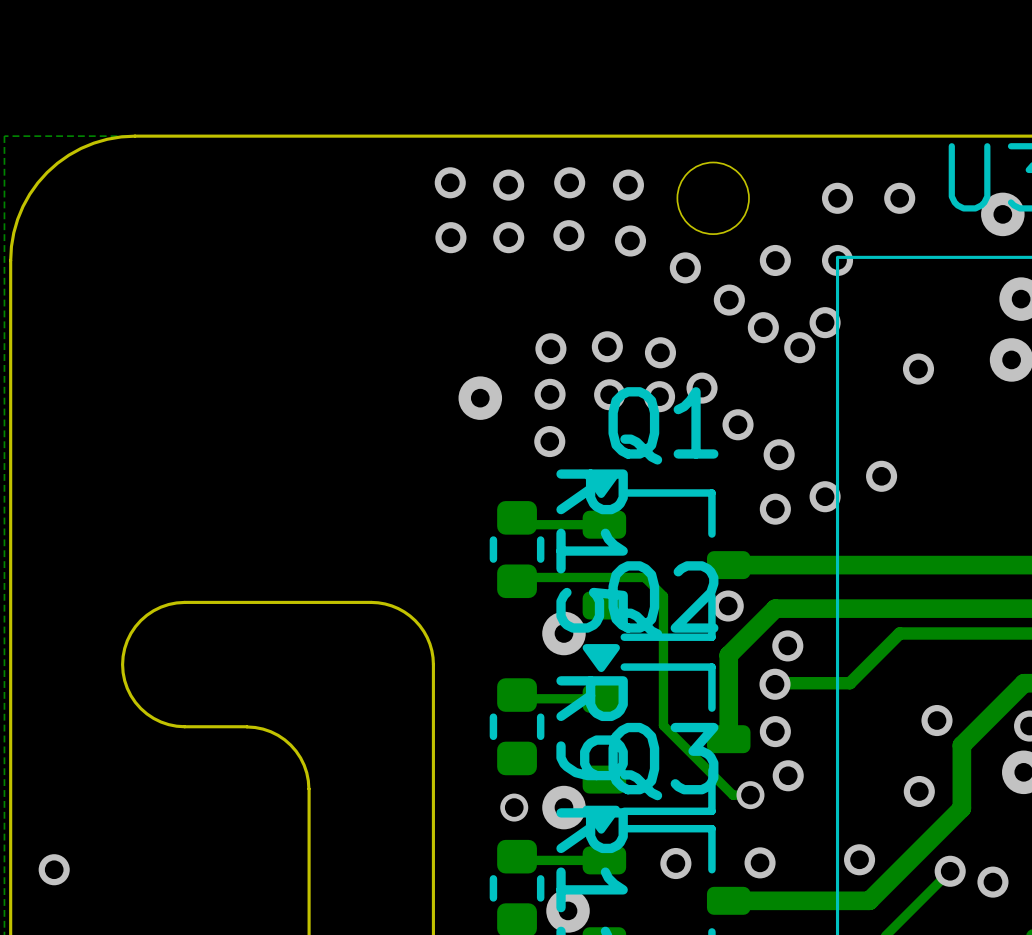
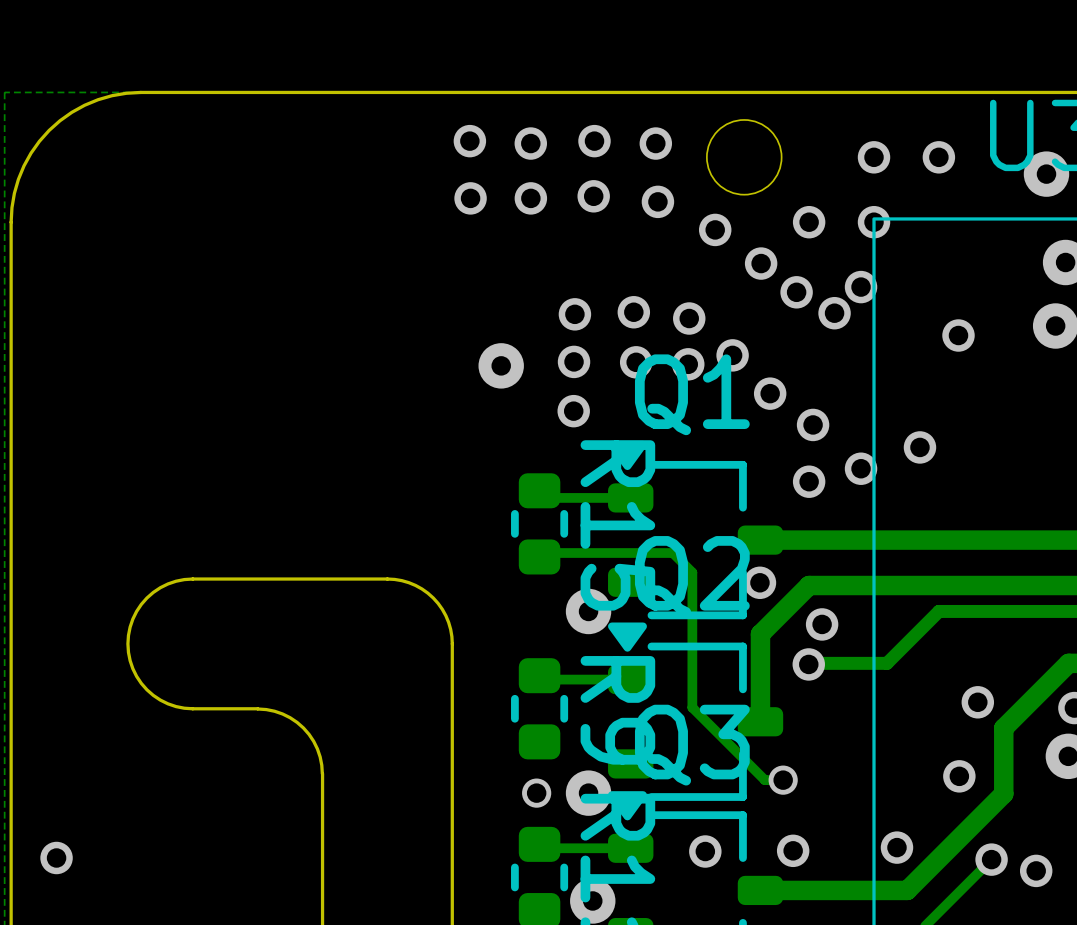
via: (775, 731) -> none
via: (788, 775) -> none

